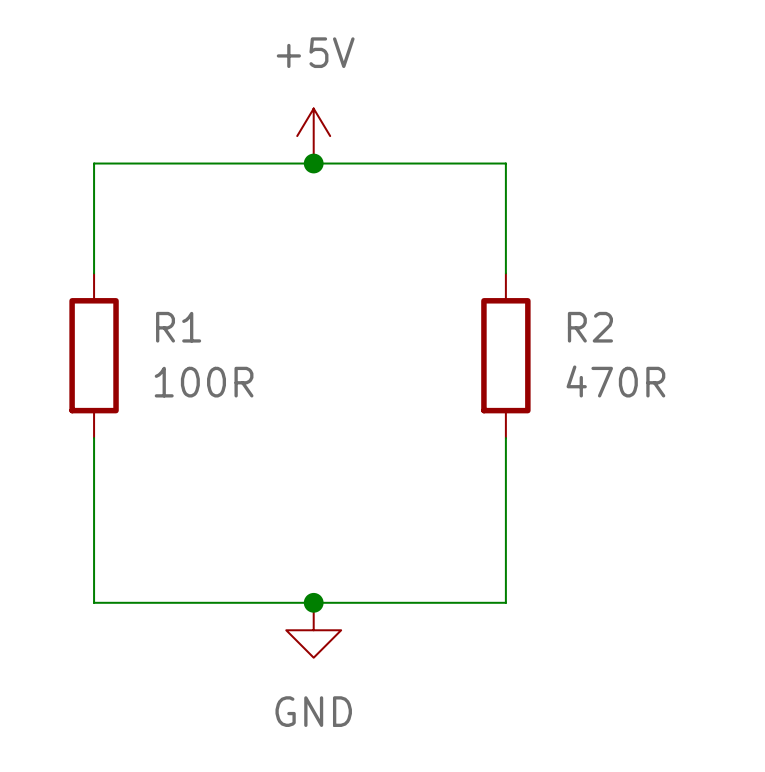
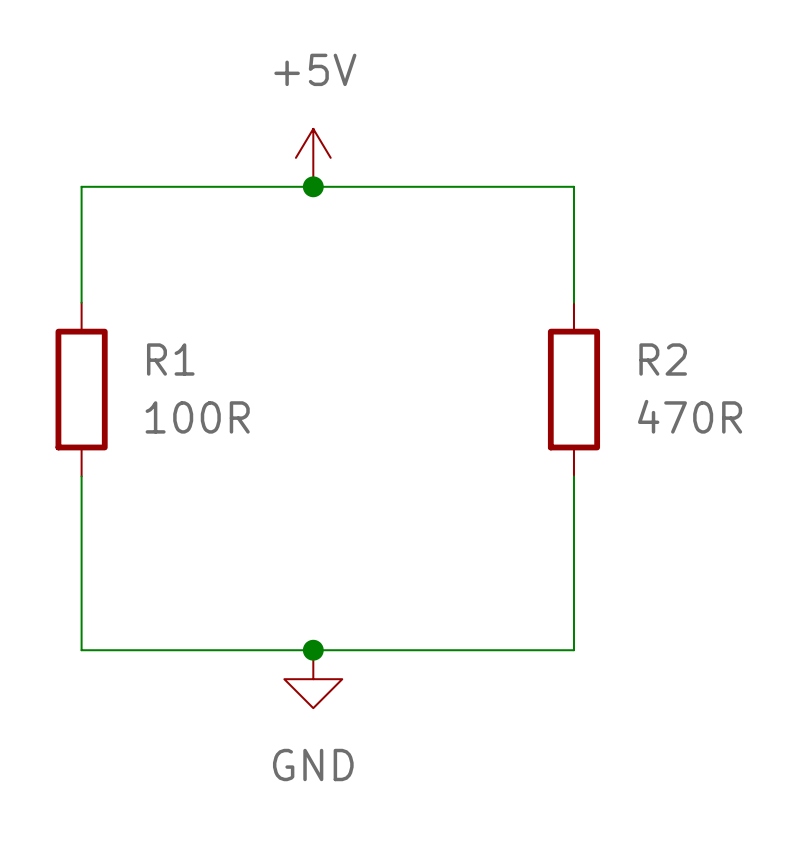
wire: (505, 163) (505, 273) -> (516, 186) (573, 186) (573, 302)
R2 position: (505, 355) -> (573, 389)
wire: (505, 438) (505, 602) -> (573, 476) (573, 650) (516, 650)

